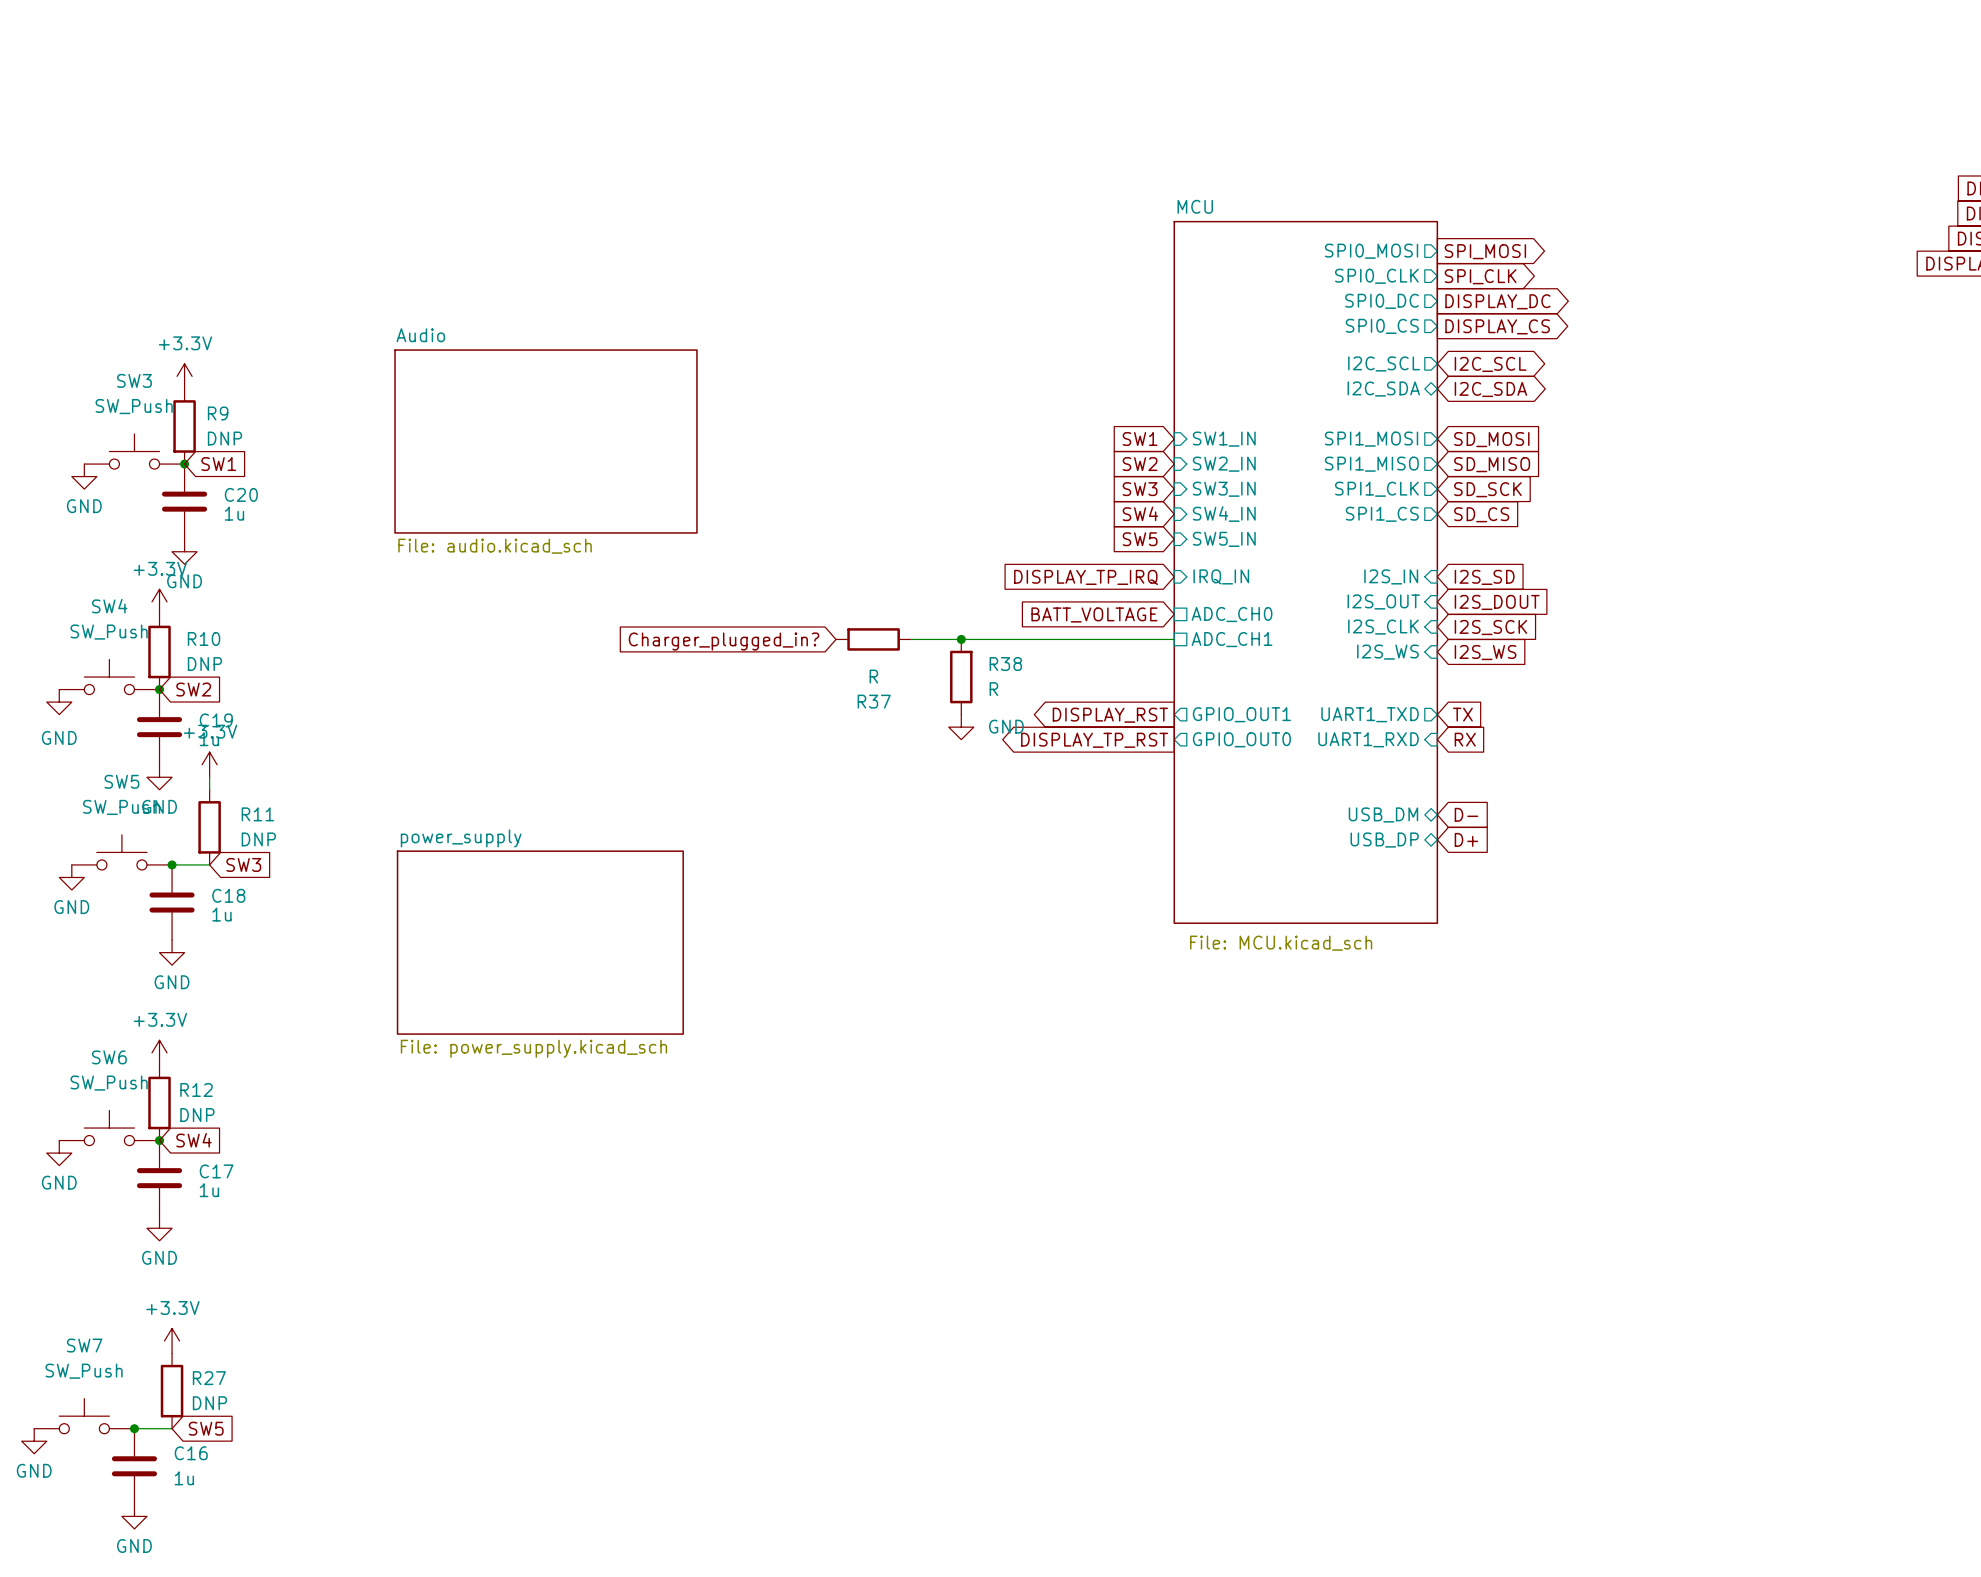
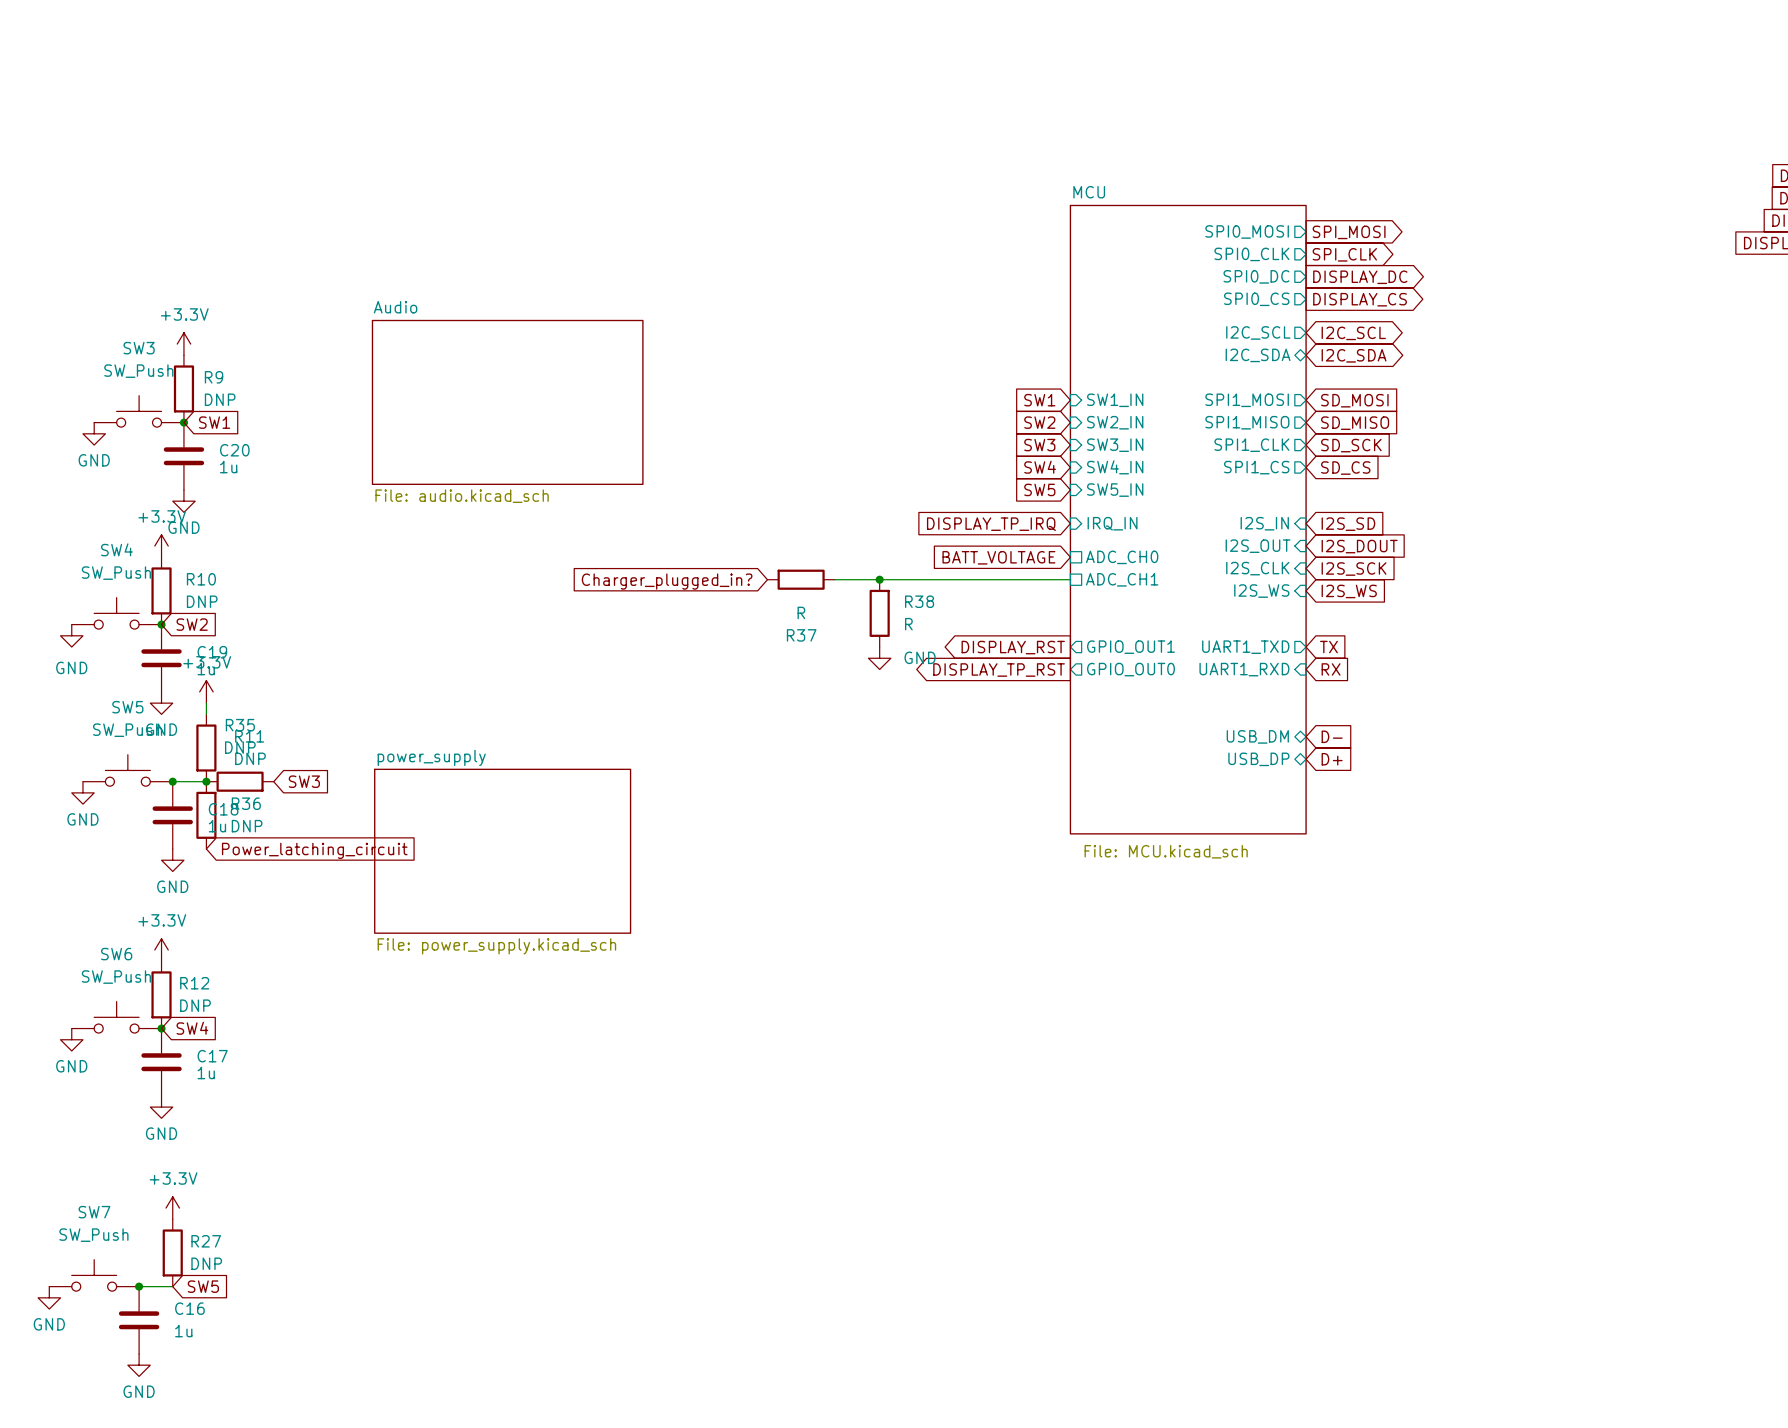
junction: none -> (206, 781)
global label position: SW3 (243, 864) -> SW3 (304, 781)
R35: none -> DNP (240, 781)
R36: none -> DNP (206, 815)
global label: none -> Power_latching_circuit (314, 850)

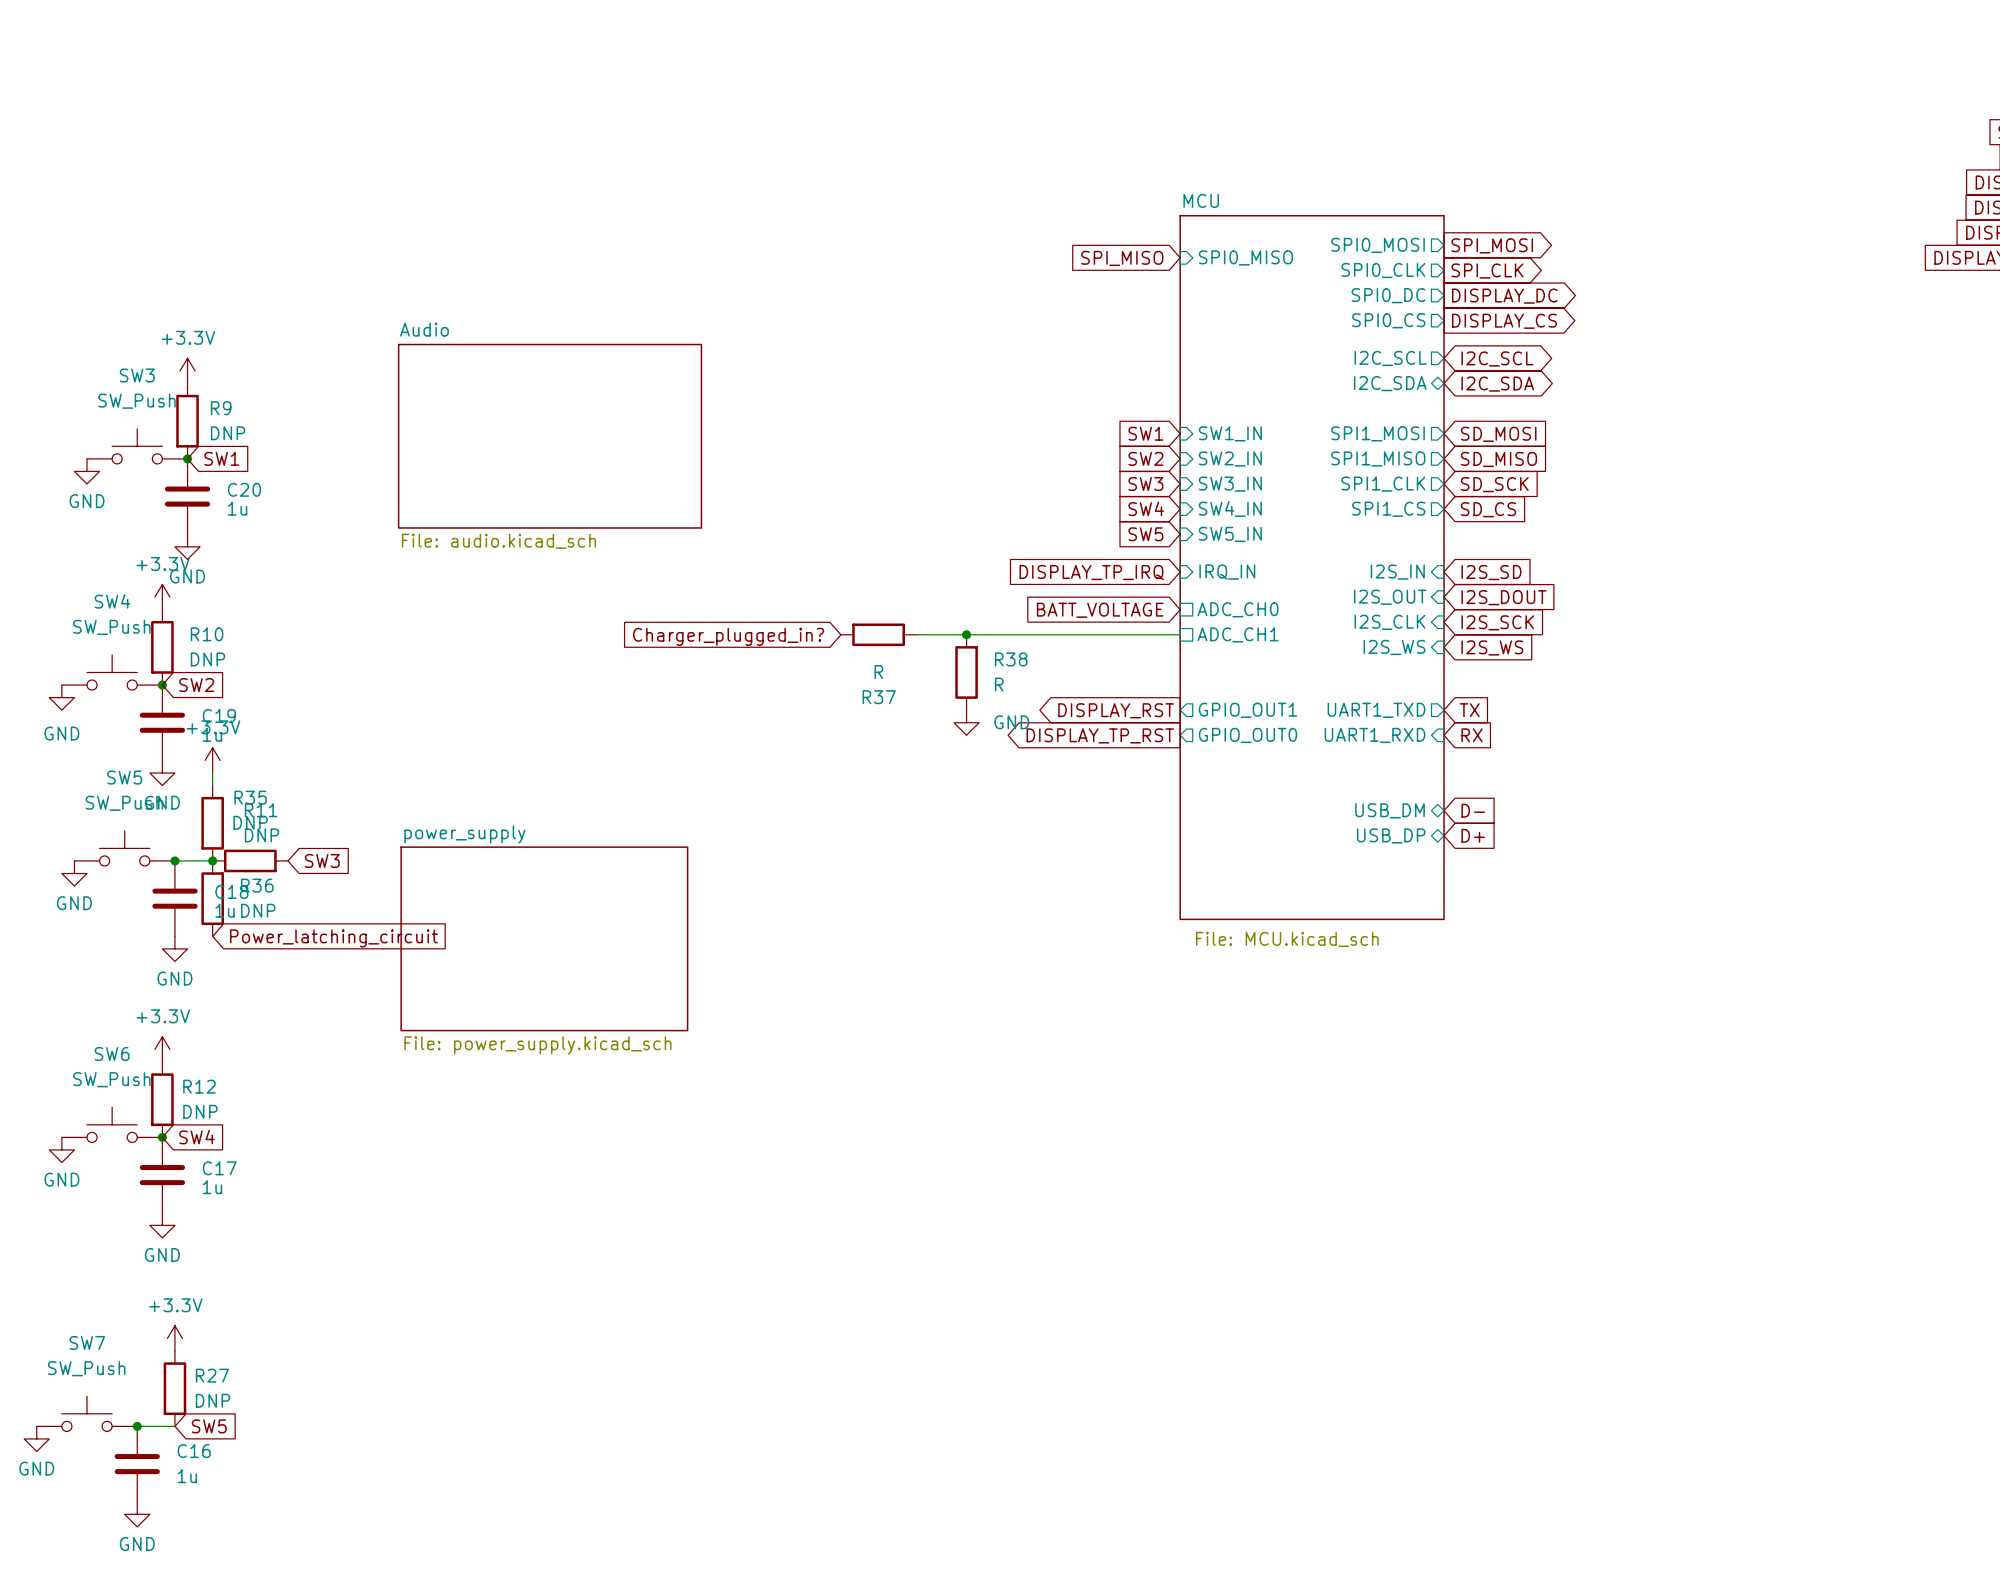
global label: none -> SPI_MISO (1122, 258)
sheet pin: none -> SPI0_MISO (1245, 257)

